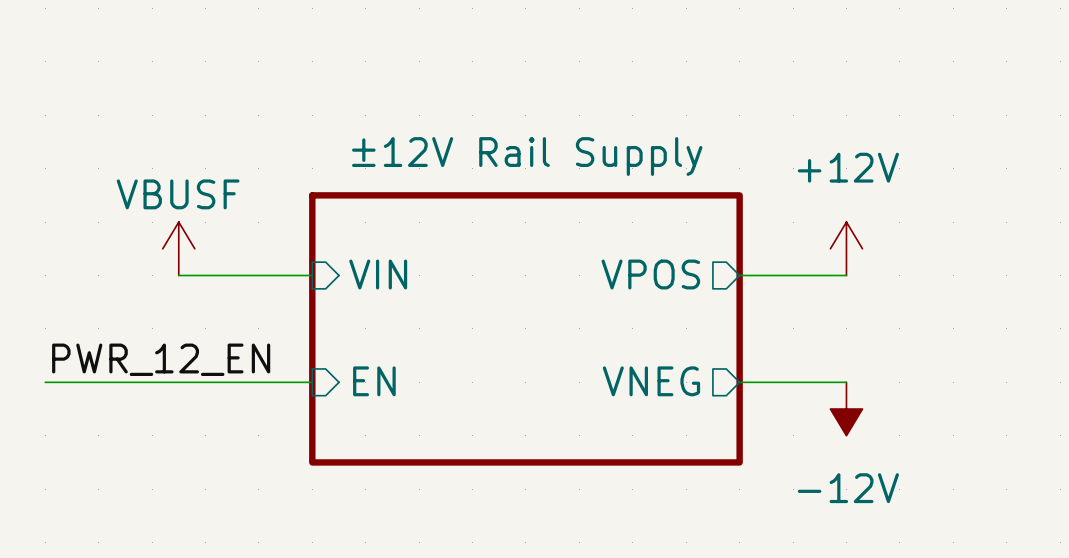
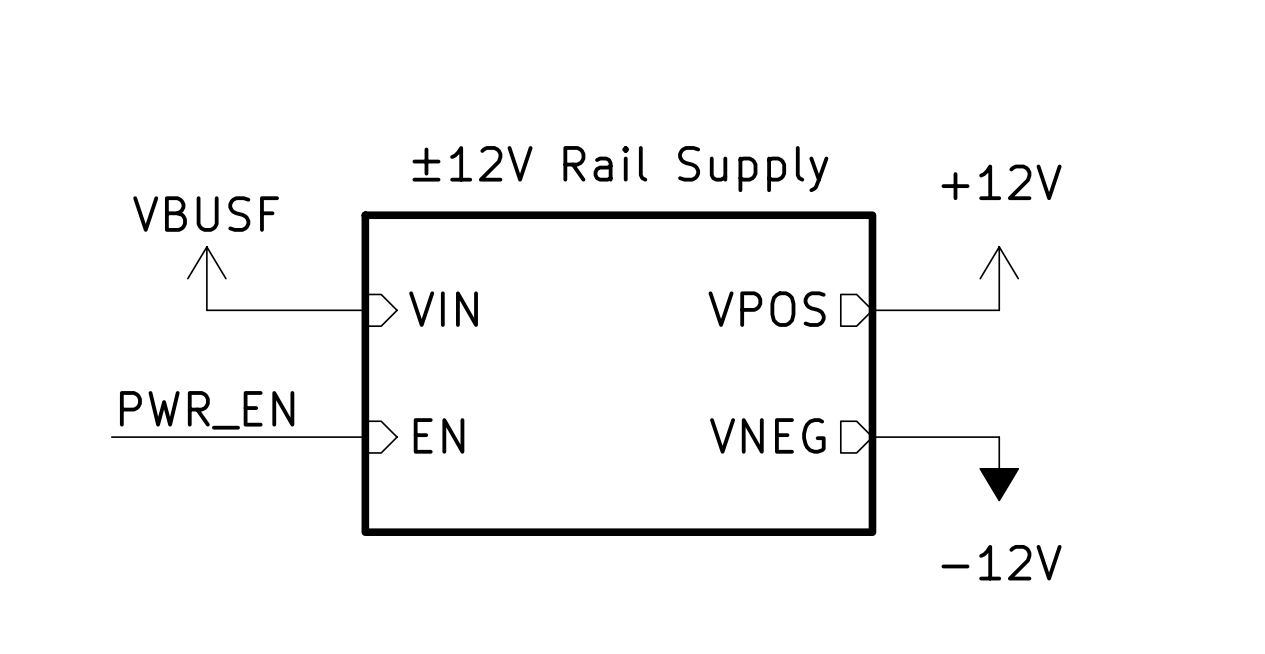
label: PWR_12_EN (161, 359) -> PWR_EN (207, 410)
wire: (45, 382) (98, 382) -> none

